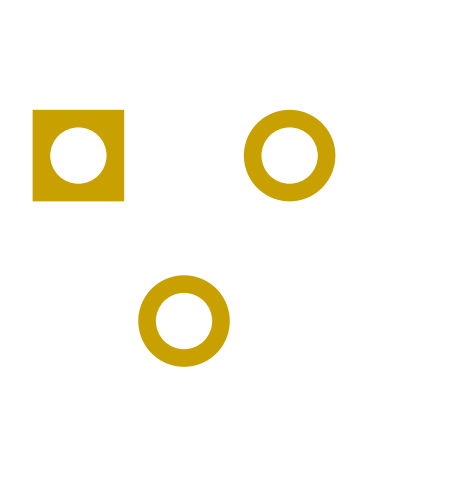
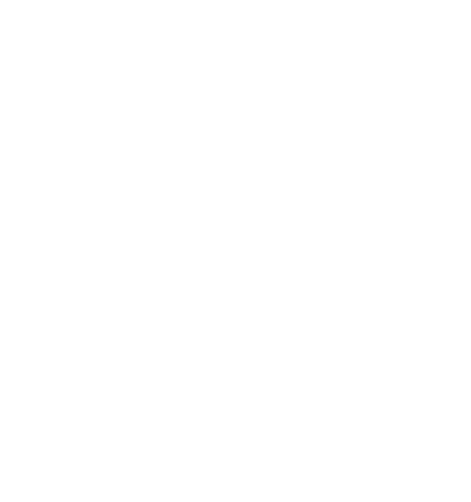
part: (184, 238) -> none

